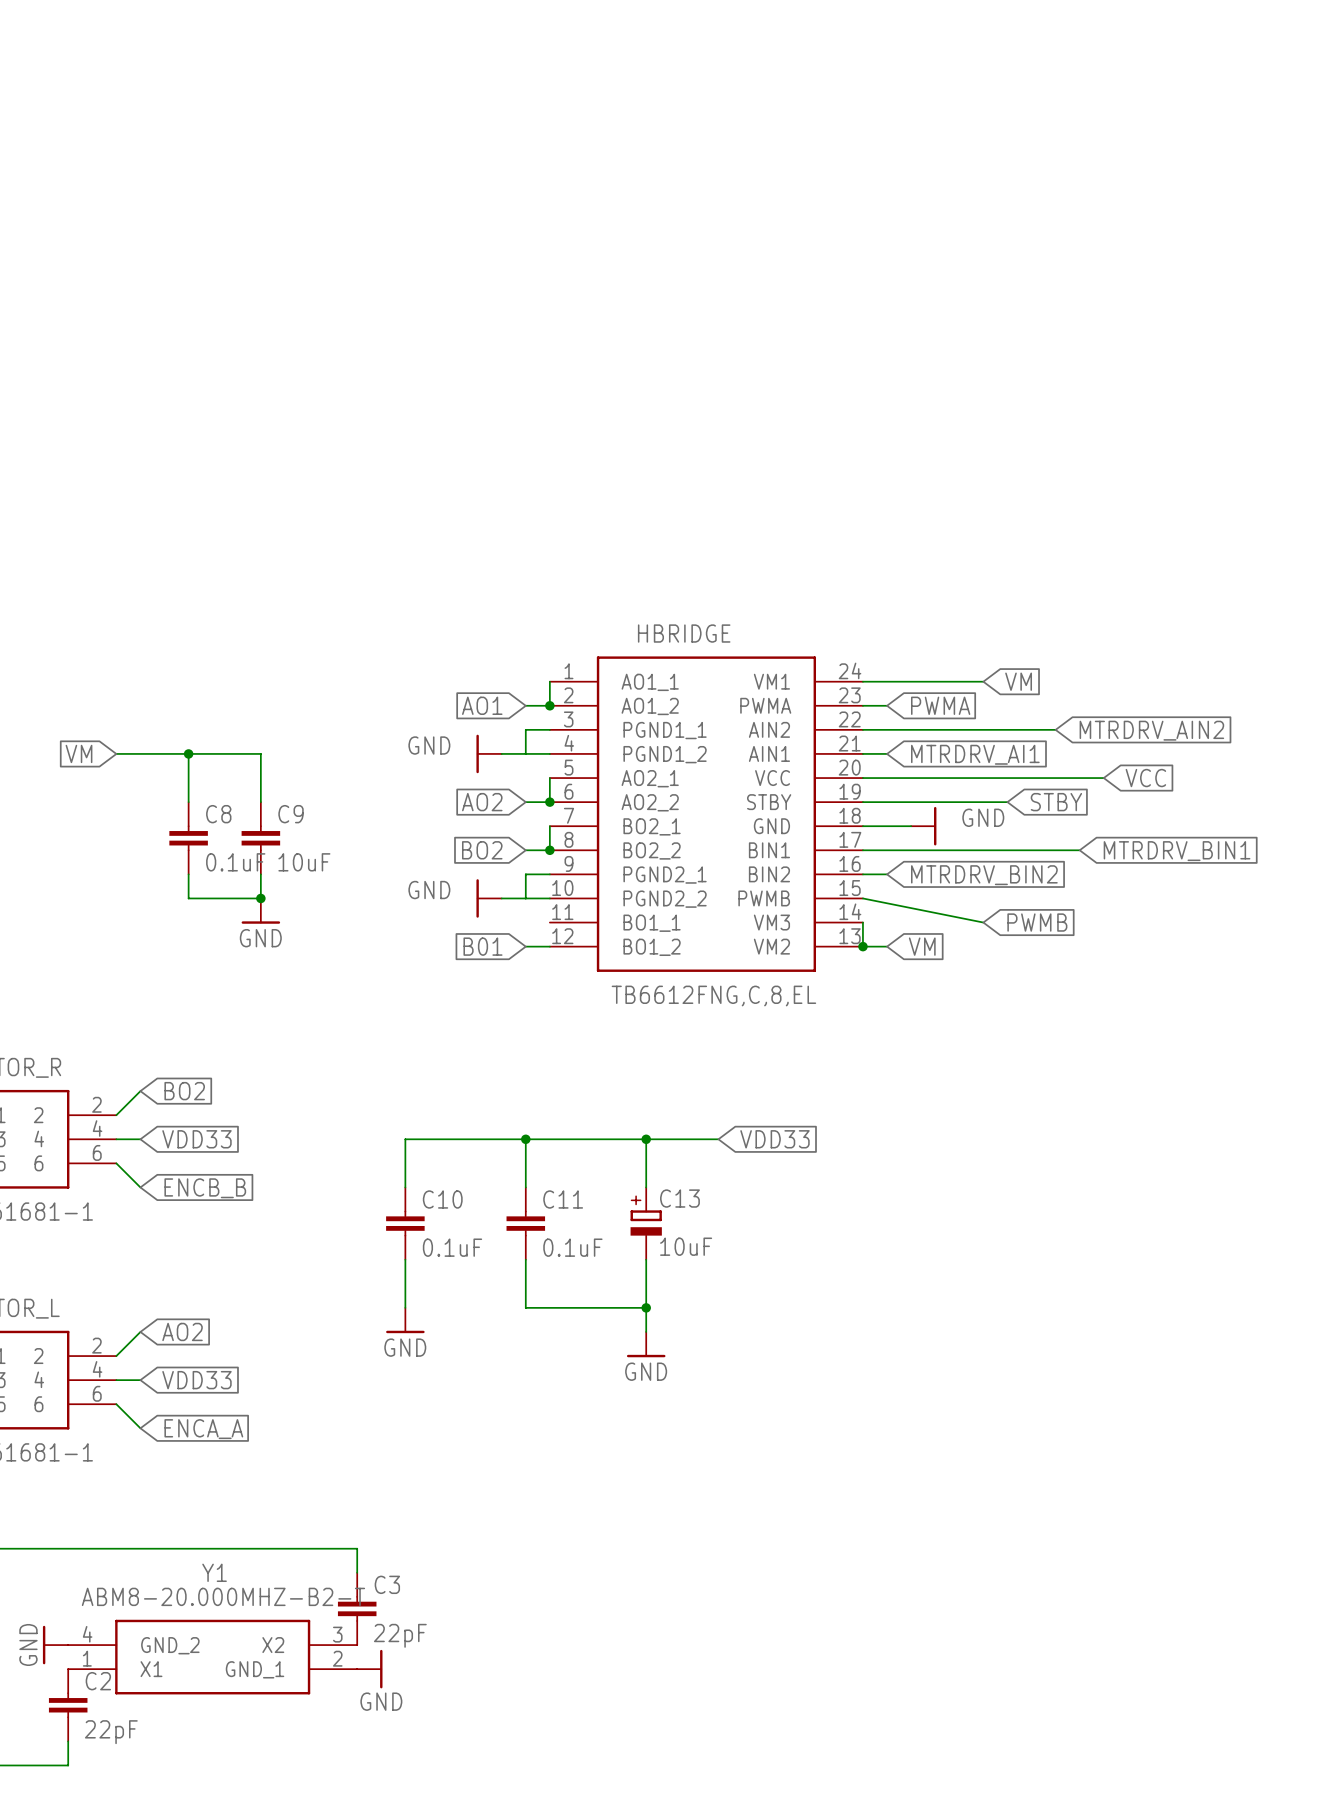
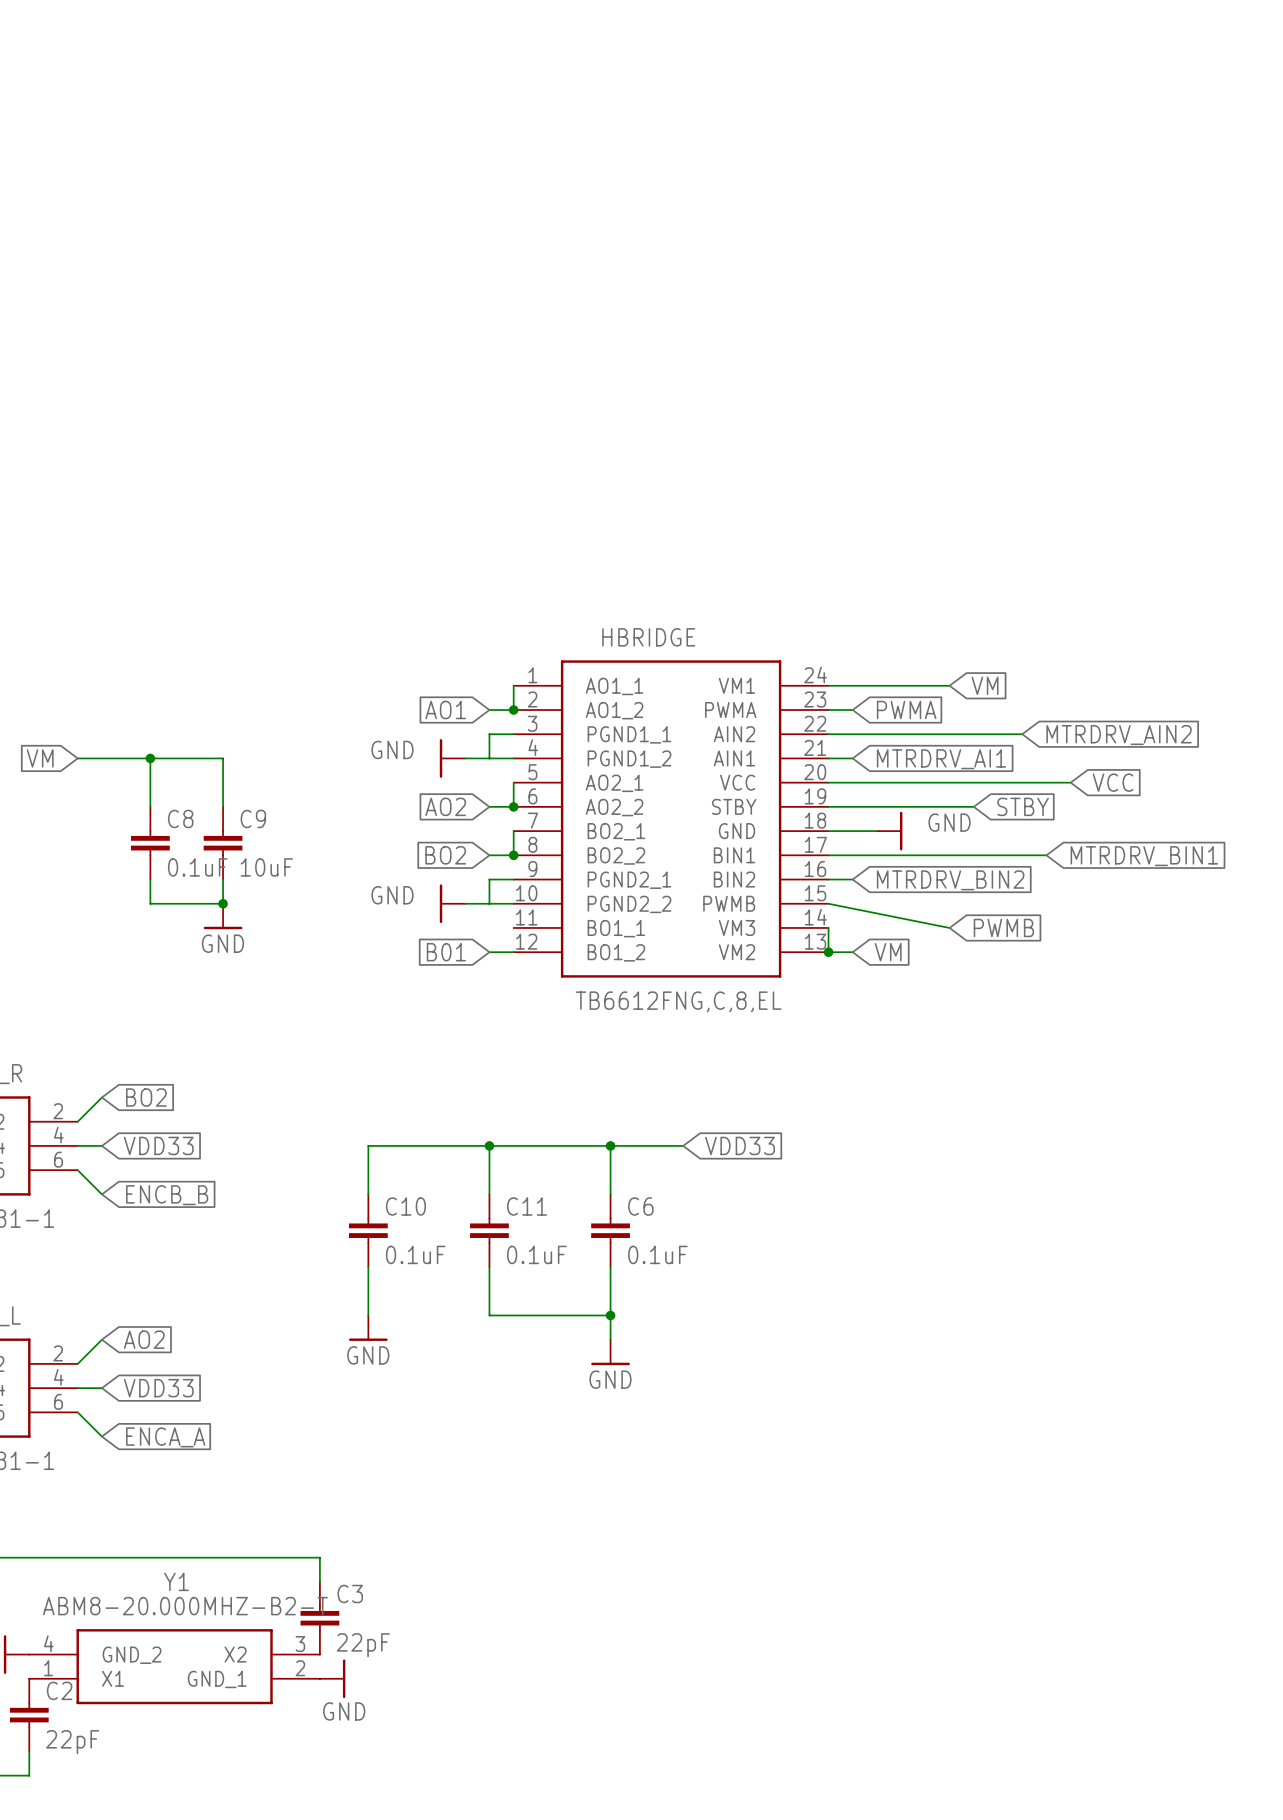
C13: 10uF (646, 1223) -> none
C6: none -> 0.1uF (610, 1230)

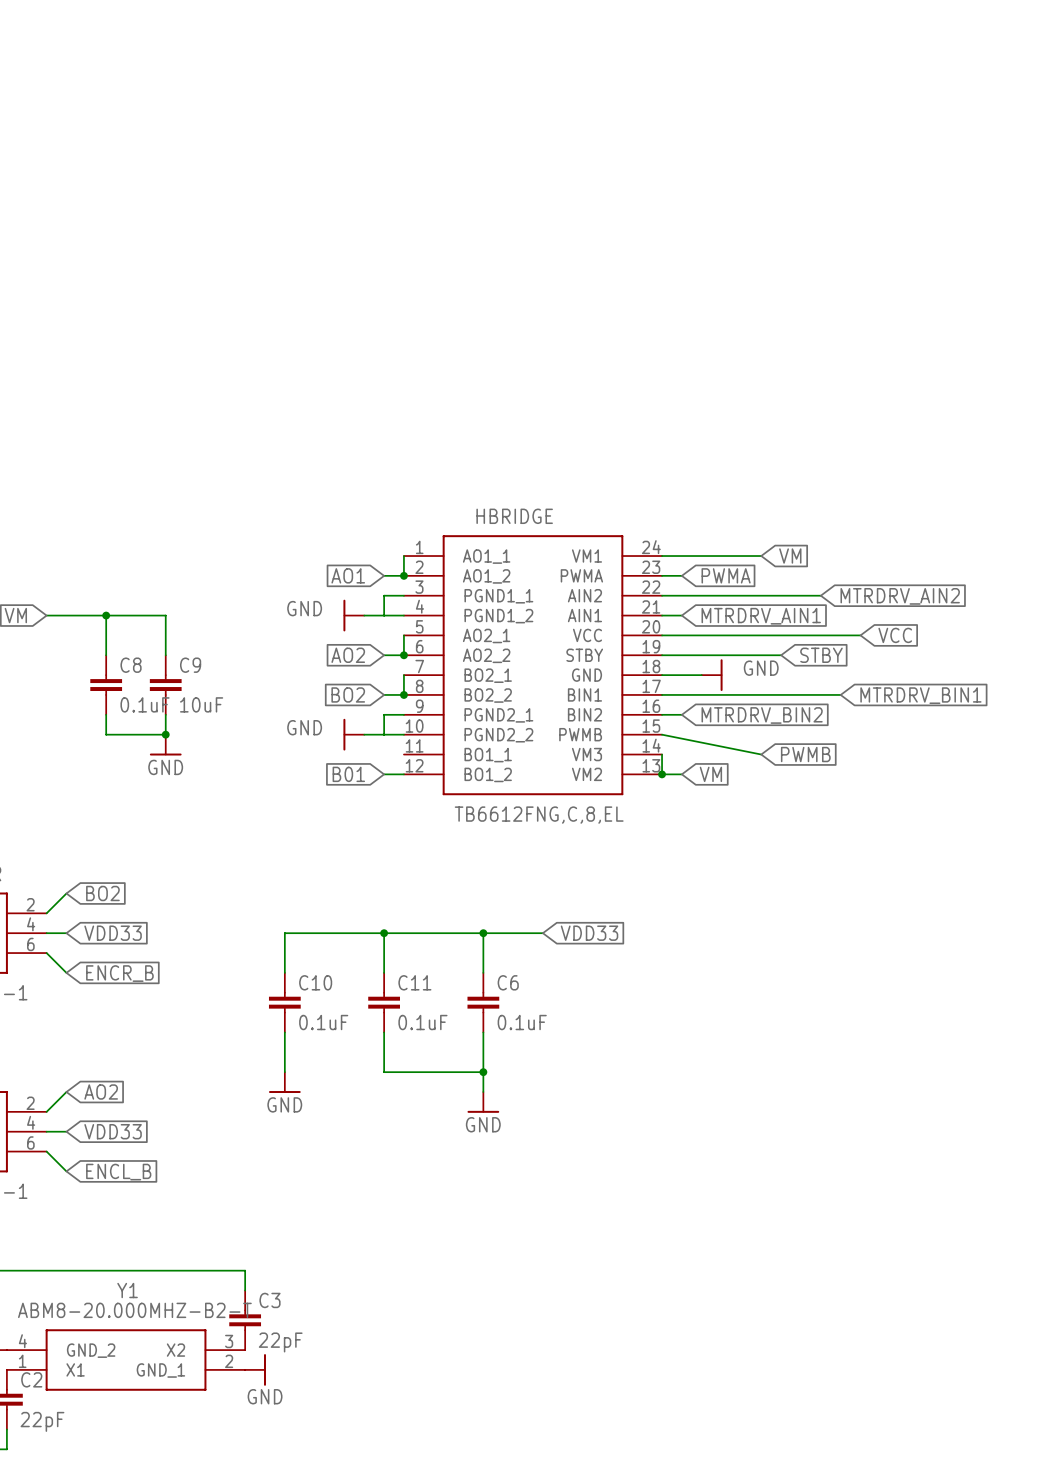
global label: MTRDRV_AI1 (941, 759) -> MTRDRV_AIN1 (761, 616)
global label: ENCB_B (167, 1195) -> ENCR_B (119, 973)
global label: ENCA_A (165, 1437) -> ENCL_B (118, 1172)

